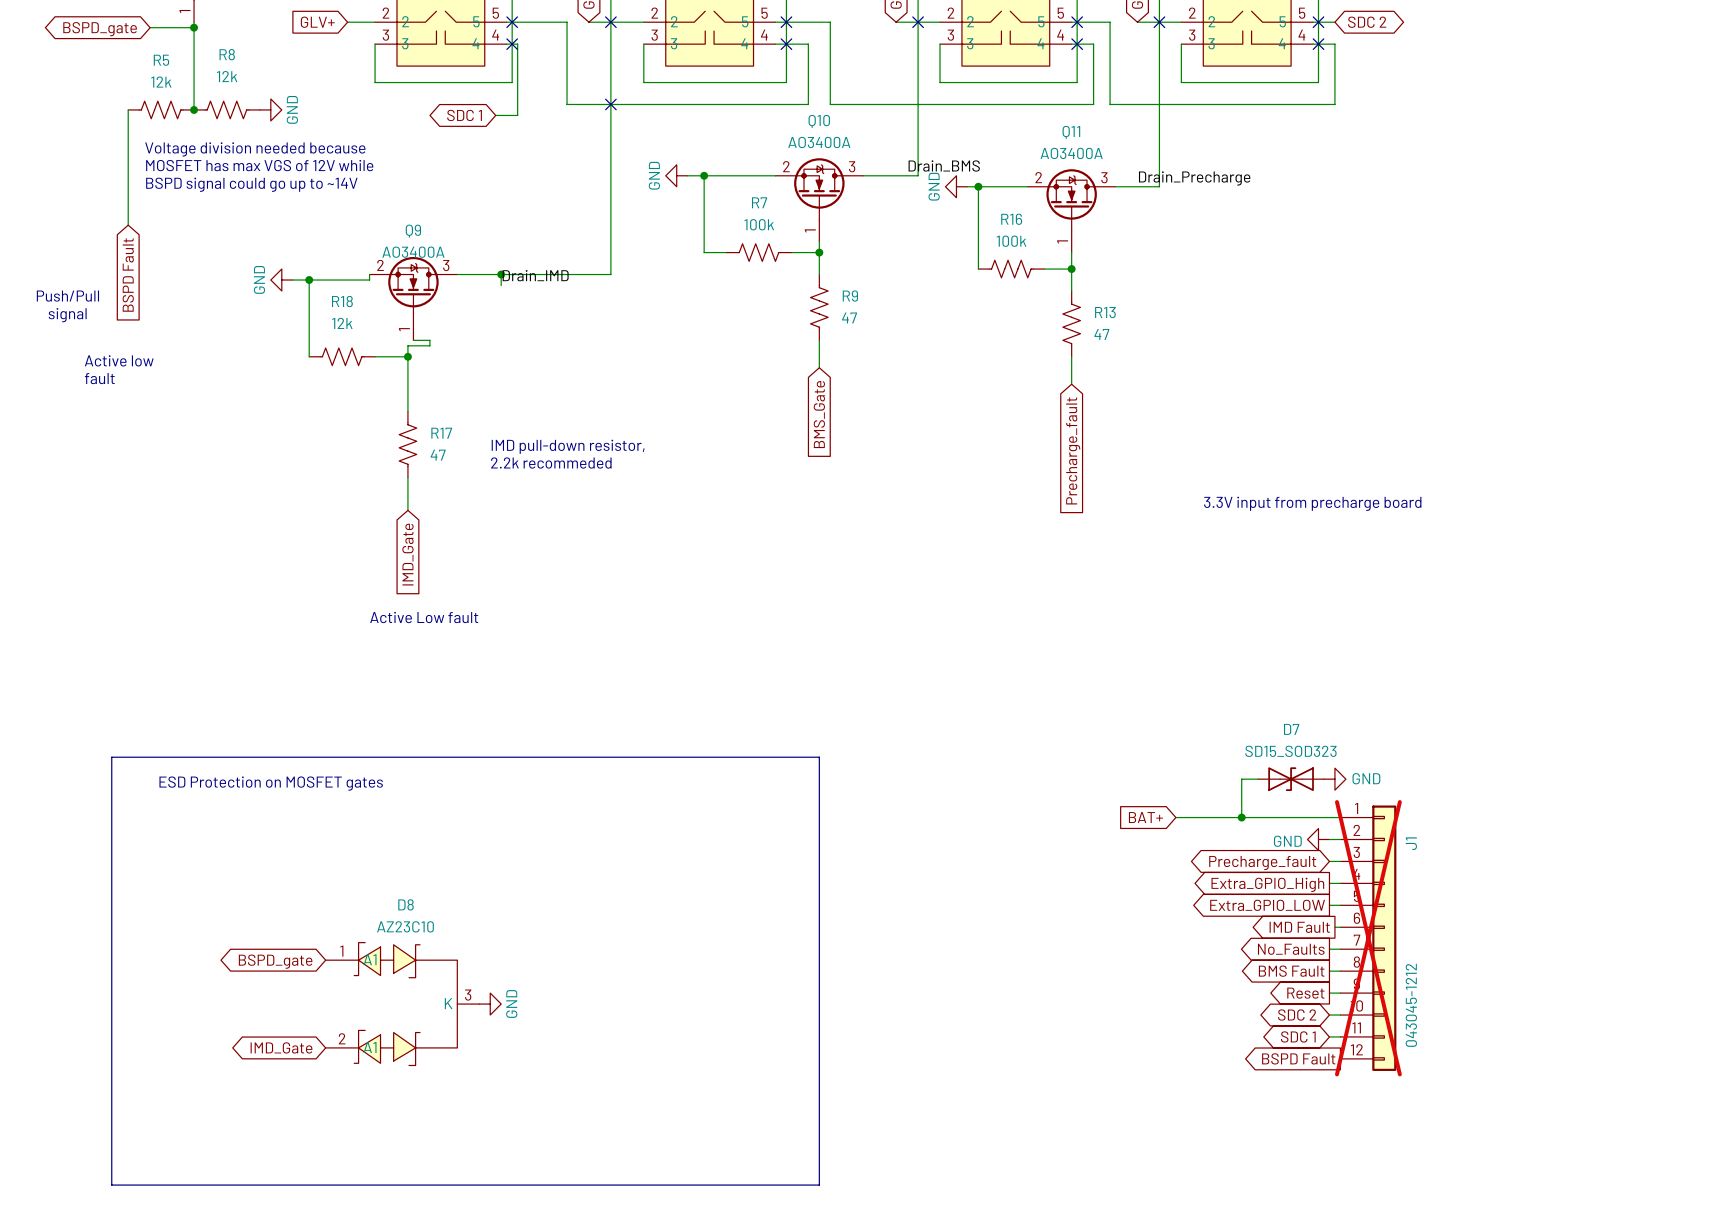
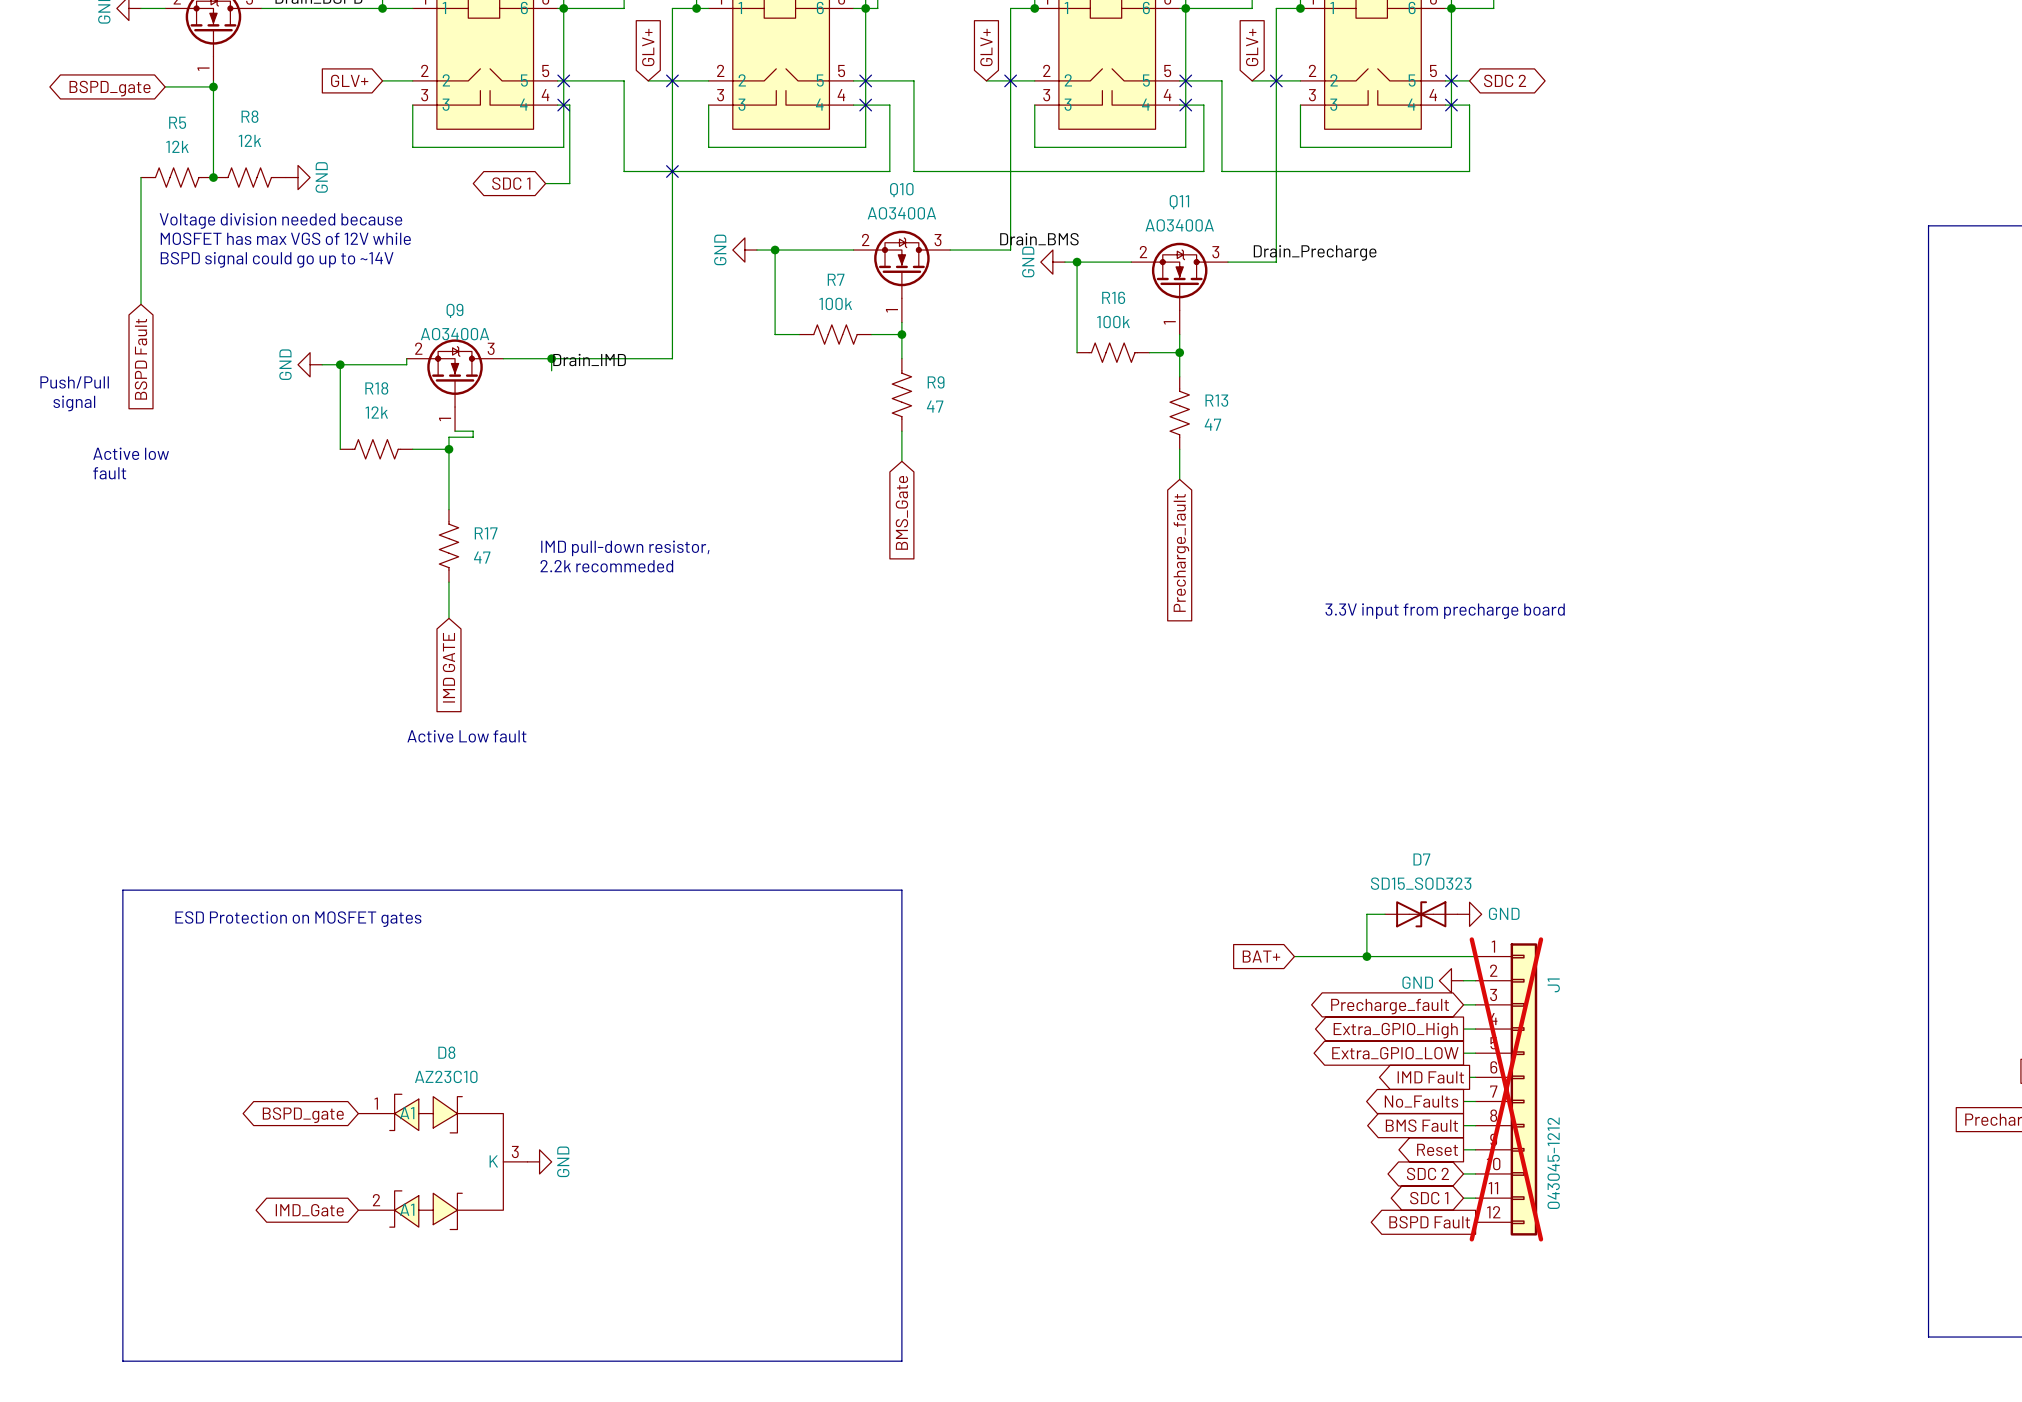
global label: IMD_Gate (407, 554) -> IMD GATE (448, 667)

